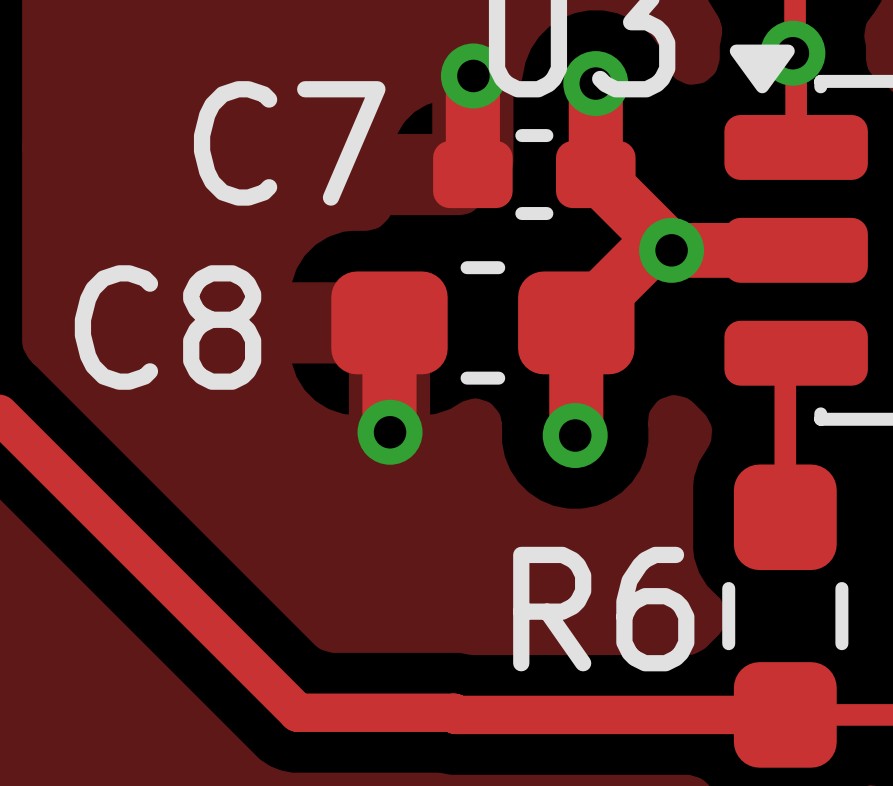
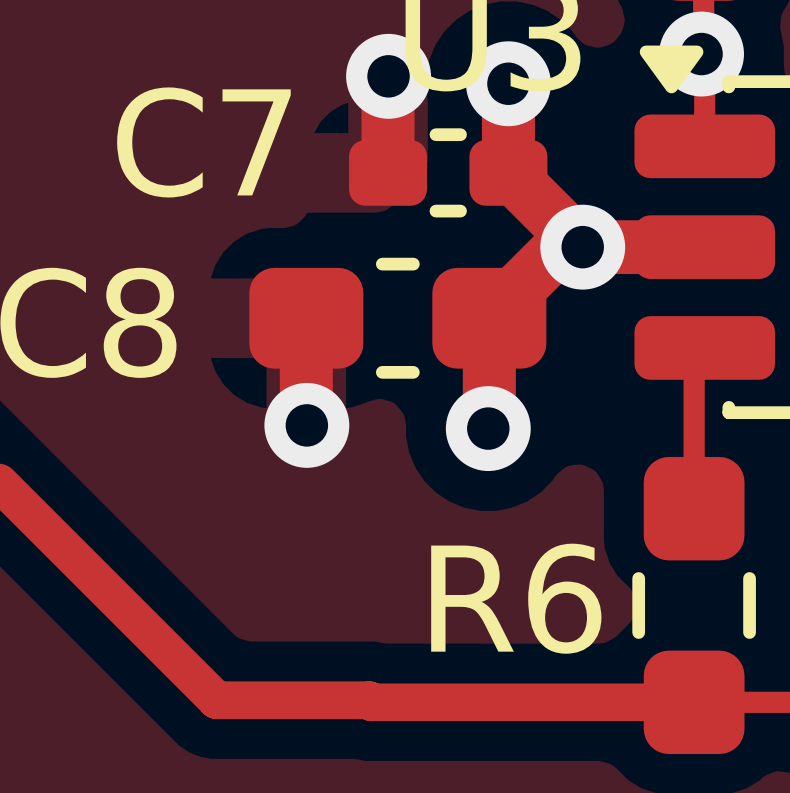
via size: [760, 20, 826, 86] -> [659, 11, 744, 97]
via size: [440, 43, 506, 109] -> [346, 33, 431, 119]
via size: [563, 51, 629, 117] -> [466, 41, 551, 127]
via size: [639, 217, 705, 283] -> [540, 204, 626, 290]
via size: [357, 399, 423, 465] -> [264, 382, 350, 468]
via size: [542, 403, 608, 469] -> [445, 386, 531, 472]

